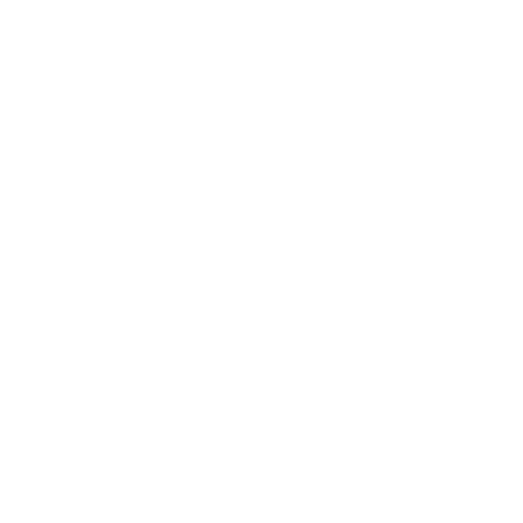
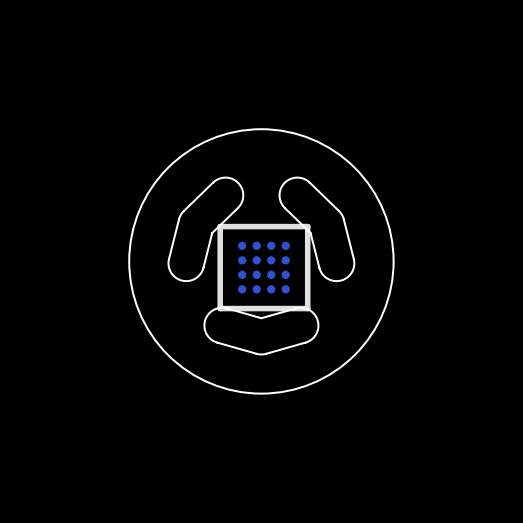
round board edge: none -> [129, 129, 394, 394]
board edge: none -> (213, 182) (183, 211) (179, 217) (168, 263) (171, 273) (179, 279) (190, 280) (200, 273) (212, 233) (237, 208) (242, 200) (242, 190) (234, 180) (224, 177) (213, 182)
board edge: none -> (309, 182) (338, 211) (343, 217) (354, 263) (351, 273) (342, 279) (330, 280) (321, 273) (310, 233) (284, 208) (280, 200) (280, 188) (288, 180) (299, 177) (309, 182)
part: none -> (263, 267)
board edge: none -> (295, 308) (261, 318) (227, 308) (218, 308) (210, 311) (206, 316) (204, 329) (208, 336) (215, 341) (256, 353) (264, 354) (307, 341) (315, 335) (318, 324) (314, 314) (306, 308) (295, 308)

